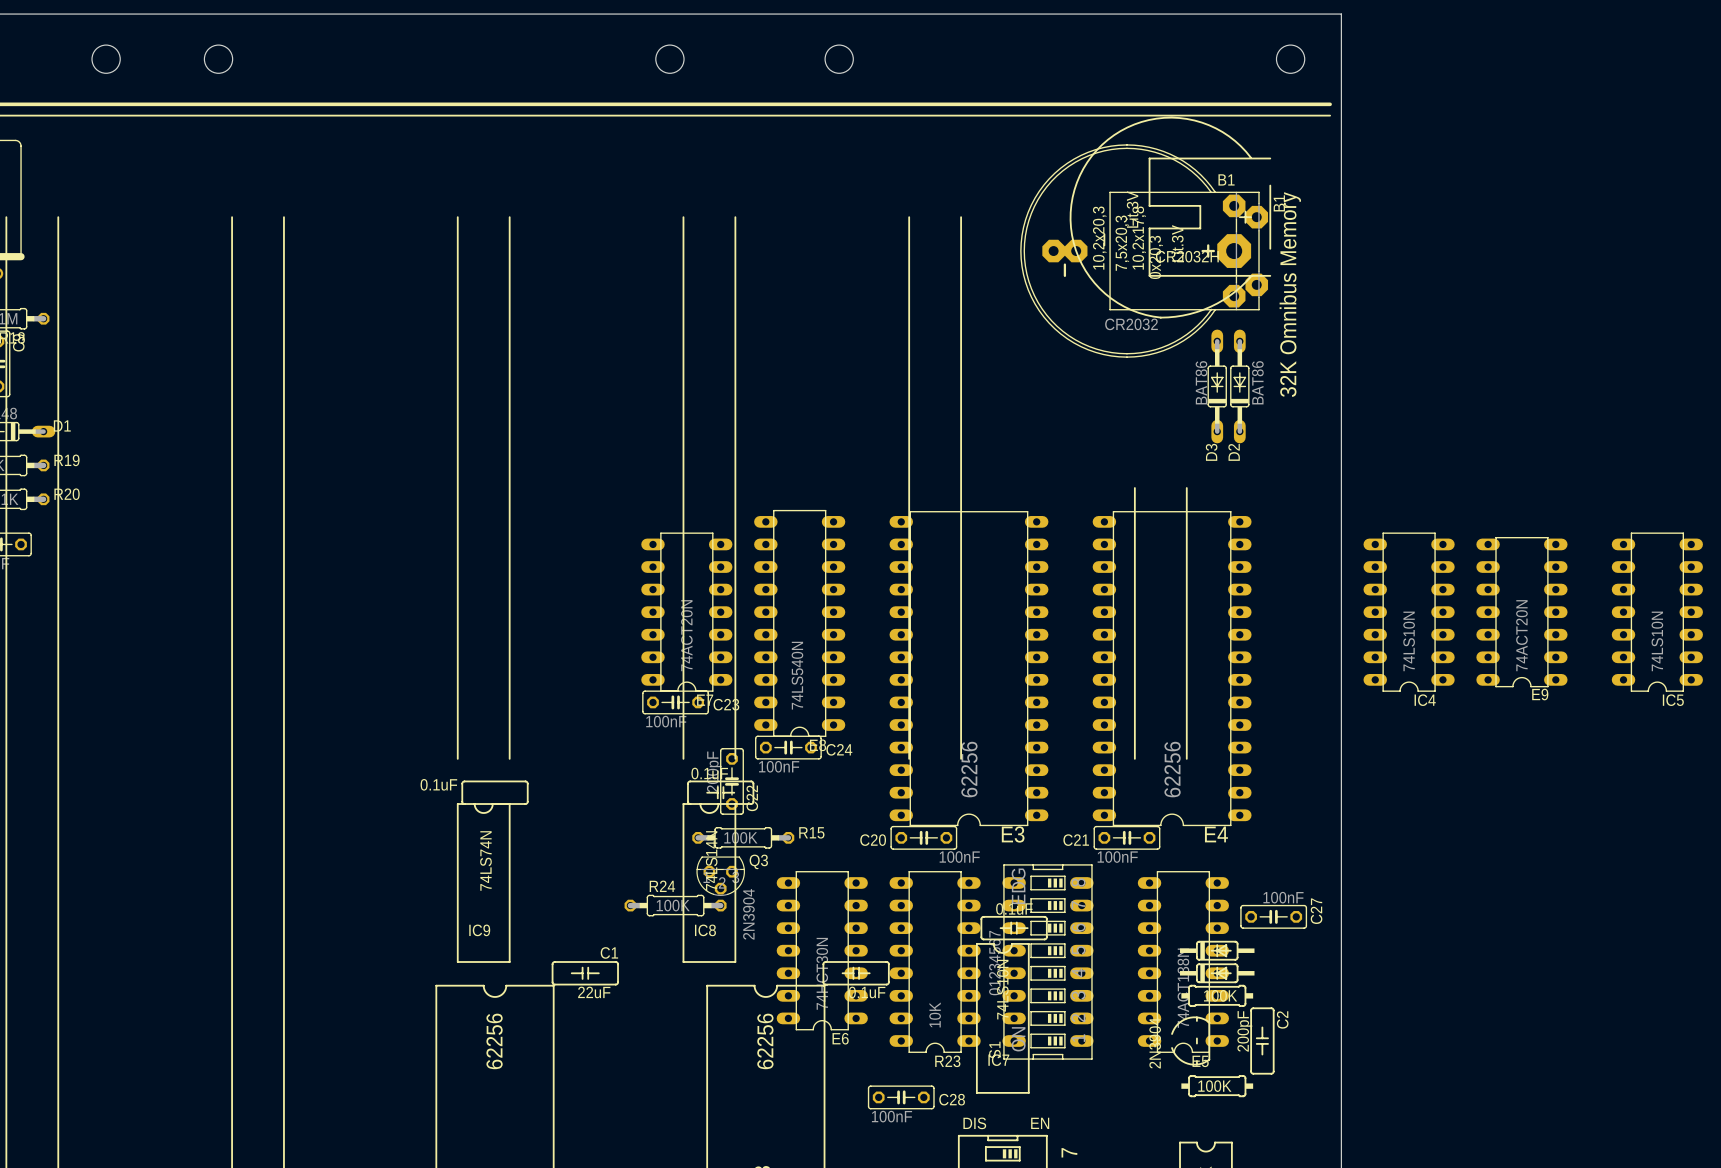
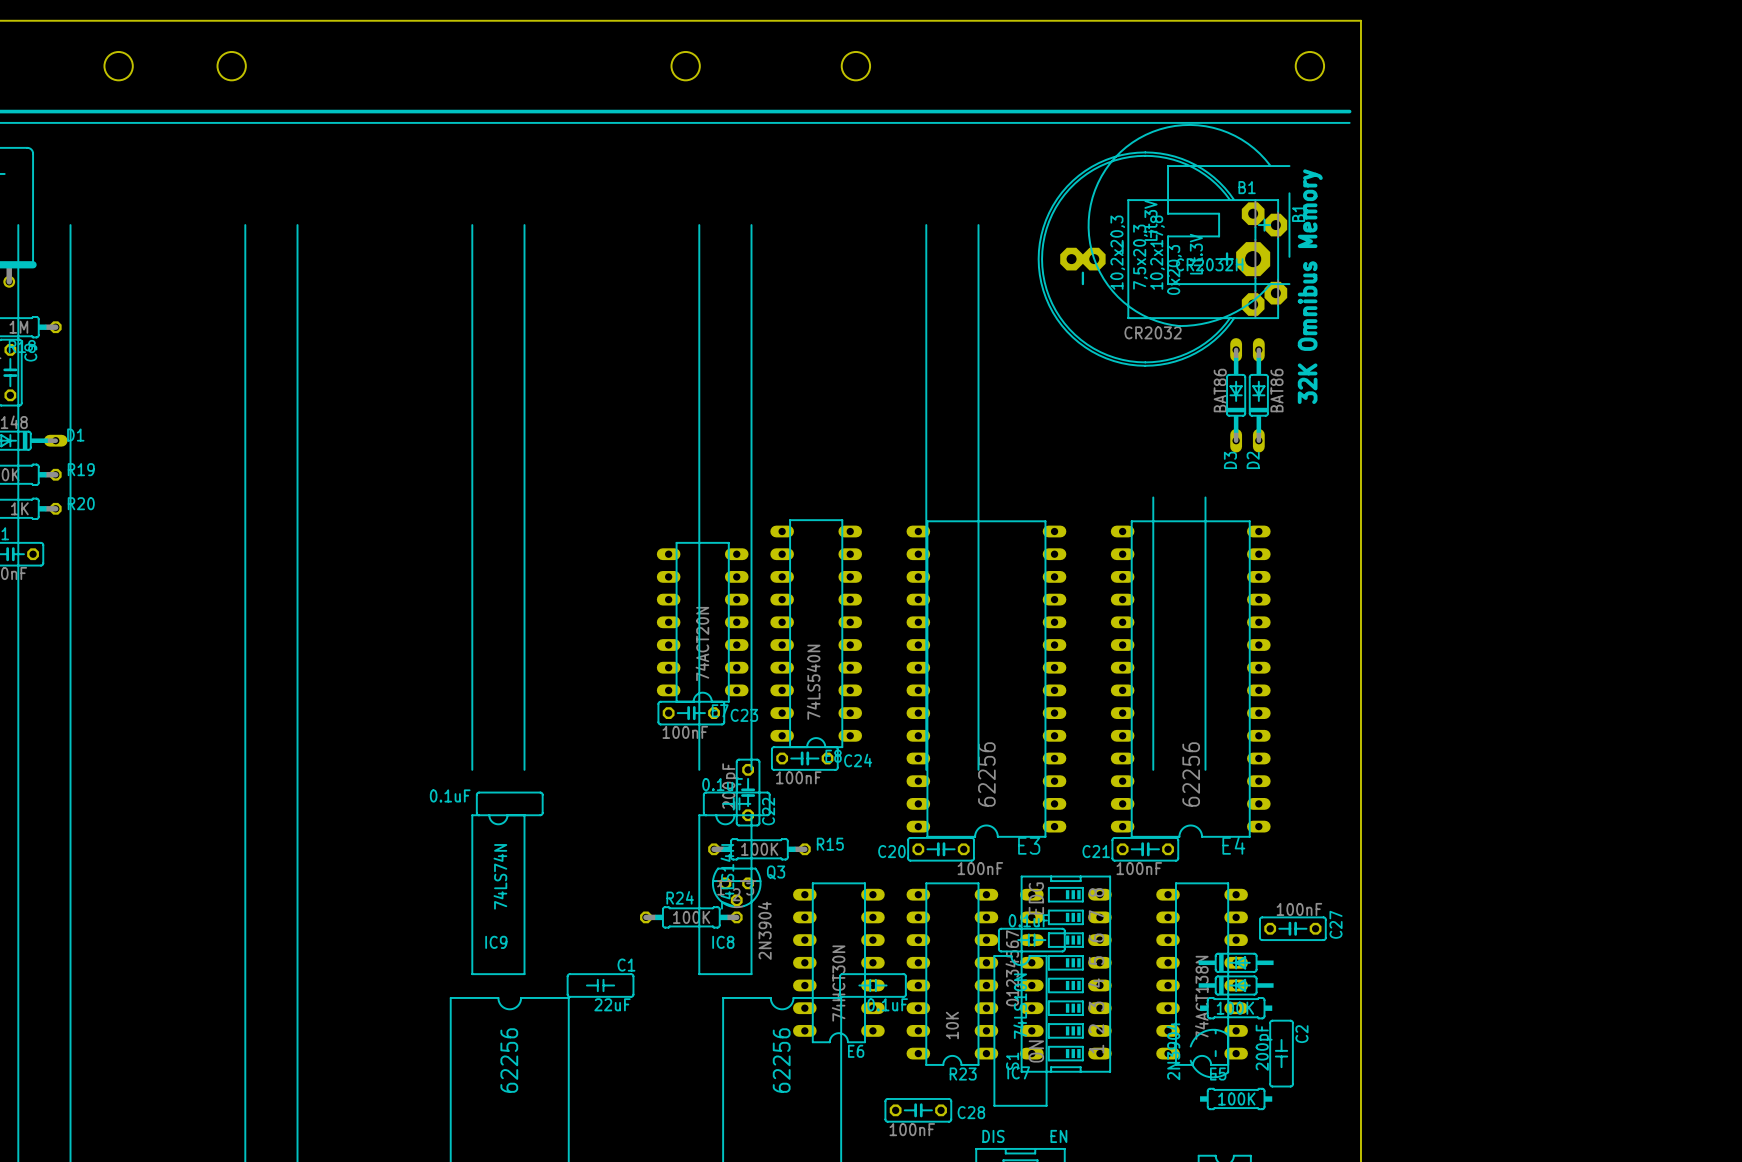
IC4: 74LS10N (1409, 612) -> none
E9: 74ACT20N (1521, 612) -> none
IC5: 74LS10N (1657, 612) -> none

